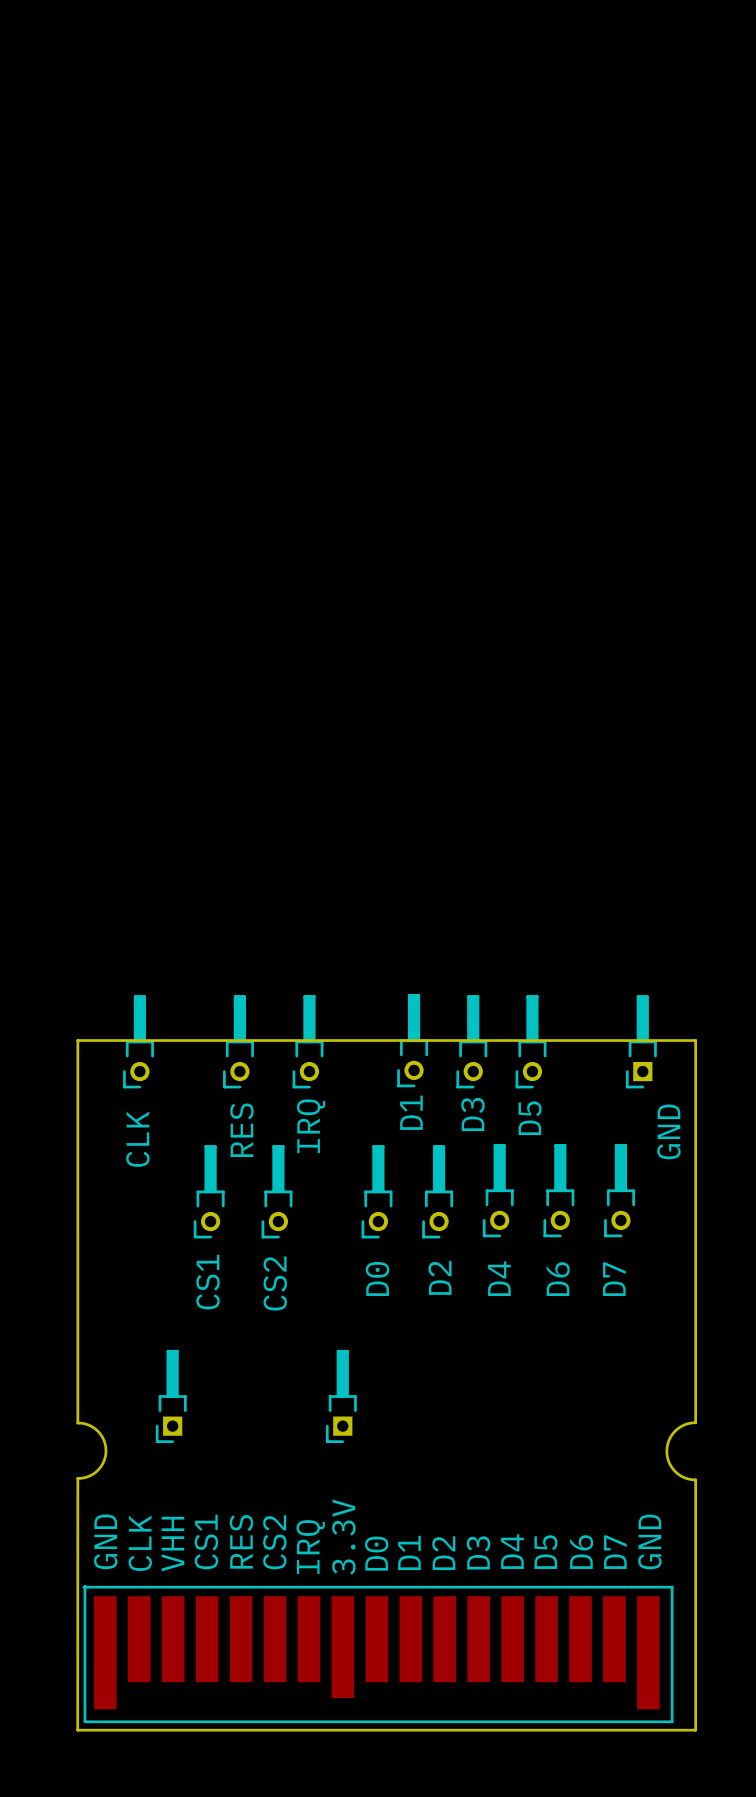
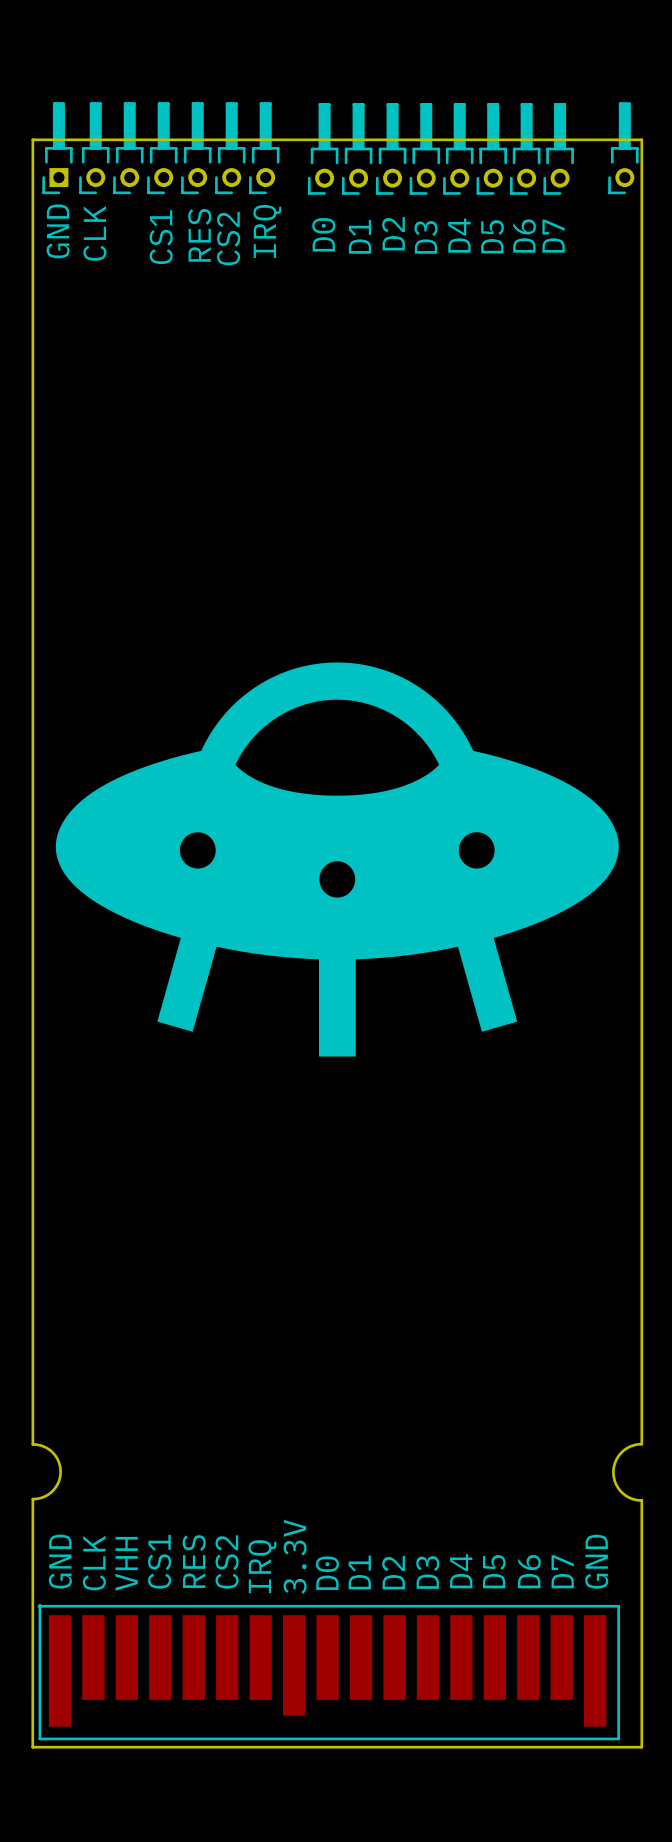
GND: none -> (57, 148)
CLK: none -> (94, 148)
part: none -> (128, 148)
RES: none -> (196, 148)
IRQ: none -> (264, 148)
part: none -> (623, 148)
drawing: none -> [55, 662, 619, 1057]
board edge: (77, 1040) (695, 1040) -> (32, 1067) (32, 139) (641, 139) (641, 1067)
D1 position: (412, 1040) -> (357, 148)
CLK: (138, 1041) -> none
RES: (238, 1041) -> none
IRQ: (308, 1041) -> none
D3 position: (471, 1041) -> (424, 148)
D5 position: (531, 1041) -> (491, 148)
GND: (641, 1041) -> none
D1 name position: D1 (411, 1112) -> D1 (360, 236)
D3 name position: D3 (472, 1114) -> D3 (426, 237)
D5 name position: D5 (530, 1118) -> D5 (492, 236)
D4 position: (498, 1190) -> (458, 148)
D6 position: (558, 1190) -> (525, 148)
D7 position: (619, 1190) -> (558, 148)
CS1 position: (209, 1191) -> (162, 148)
CS2 position: (277, 1191) -> (230, 148)
D0 position: (377, 1191) -> (323, 148)
D2 position: (437, 1191) -> (391, 148)
part: (171, 1396) -> none
part: (341, 1396) -> none

